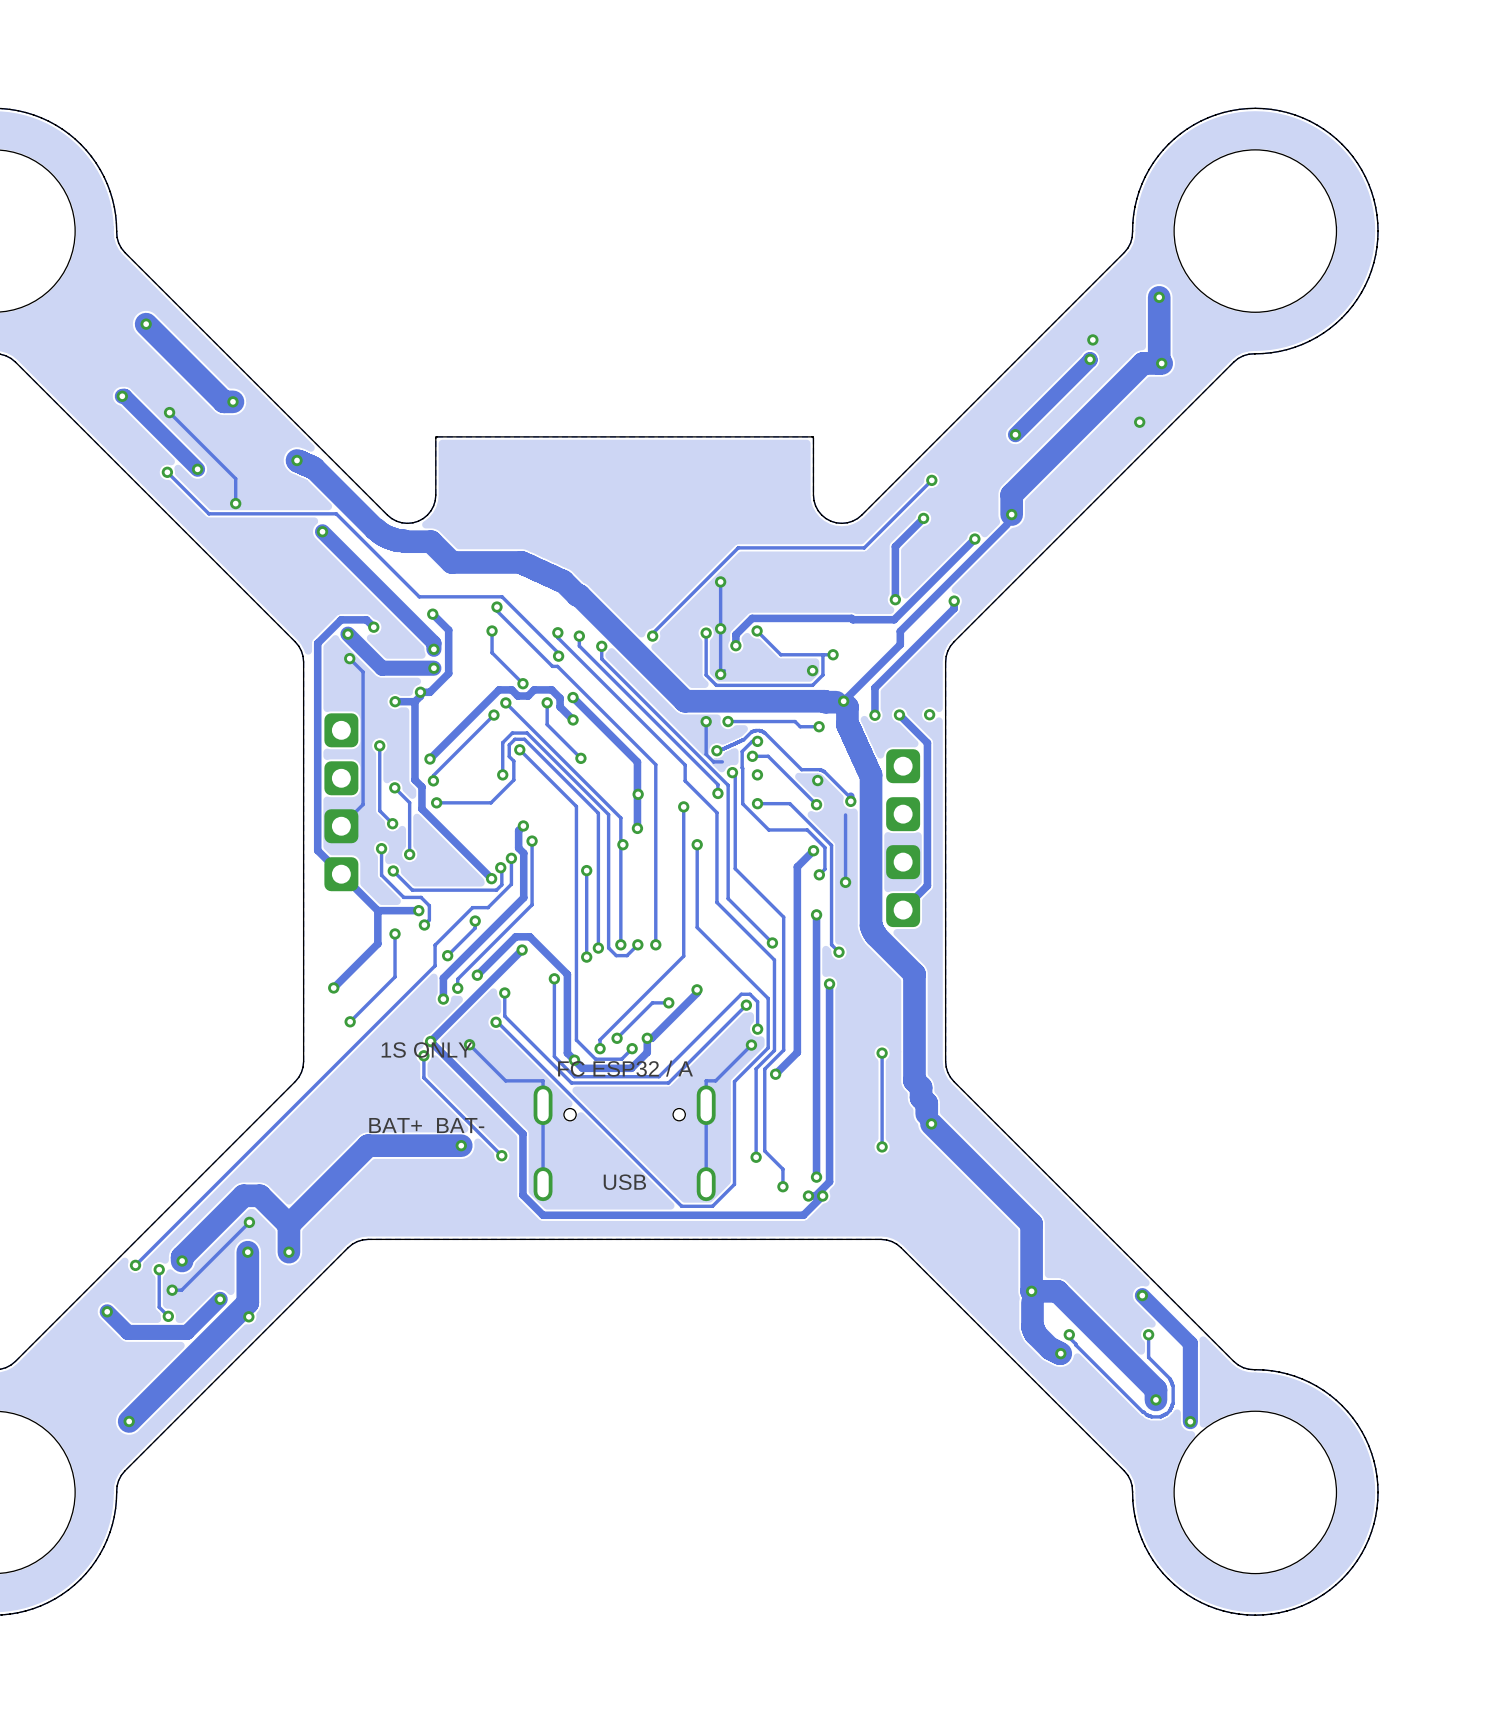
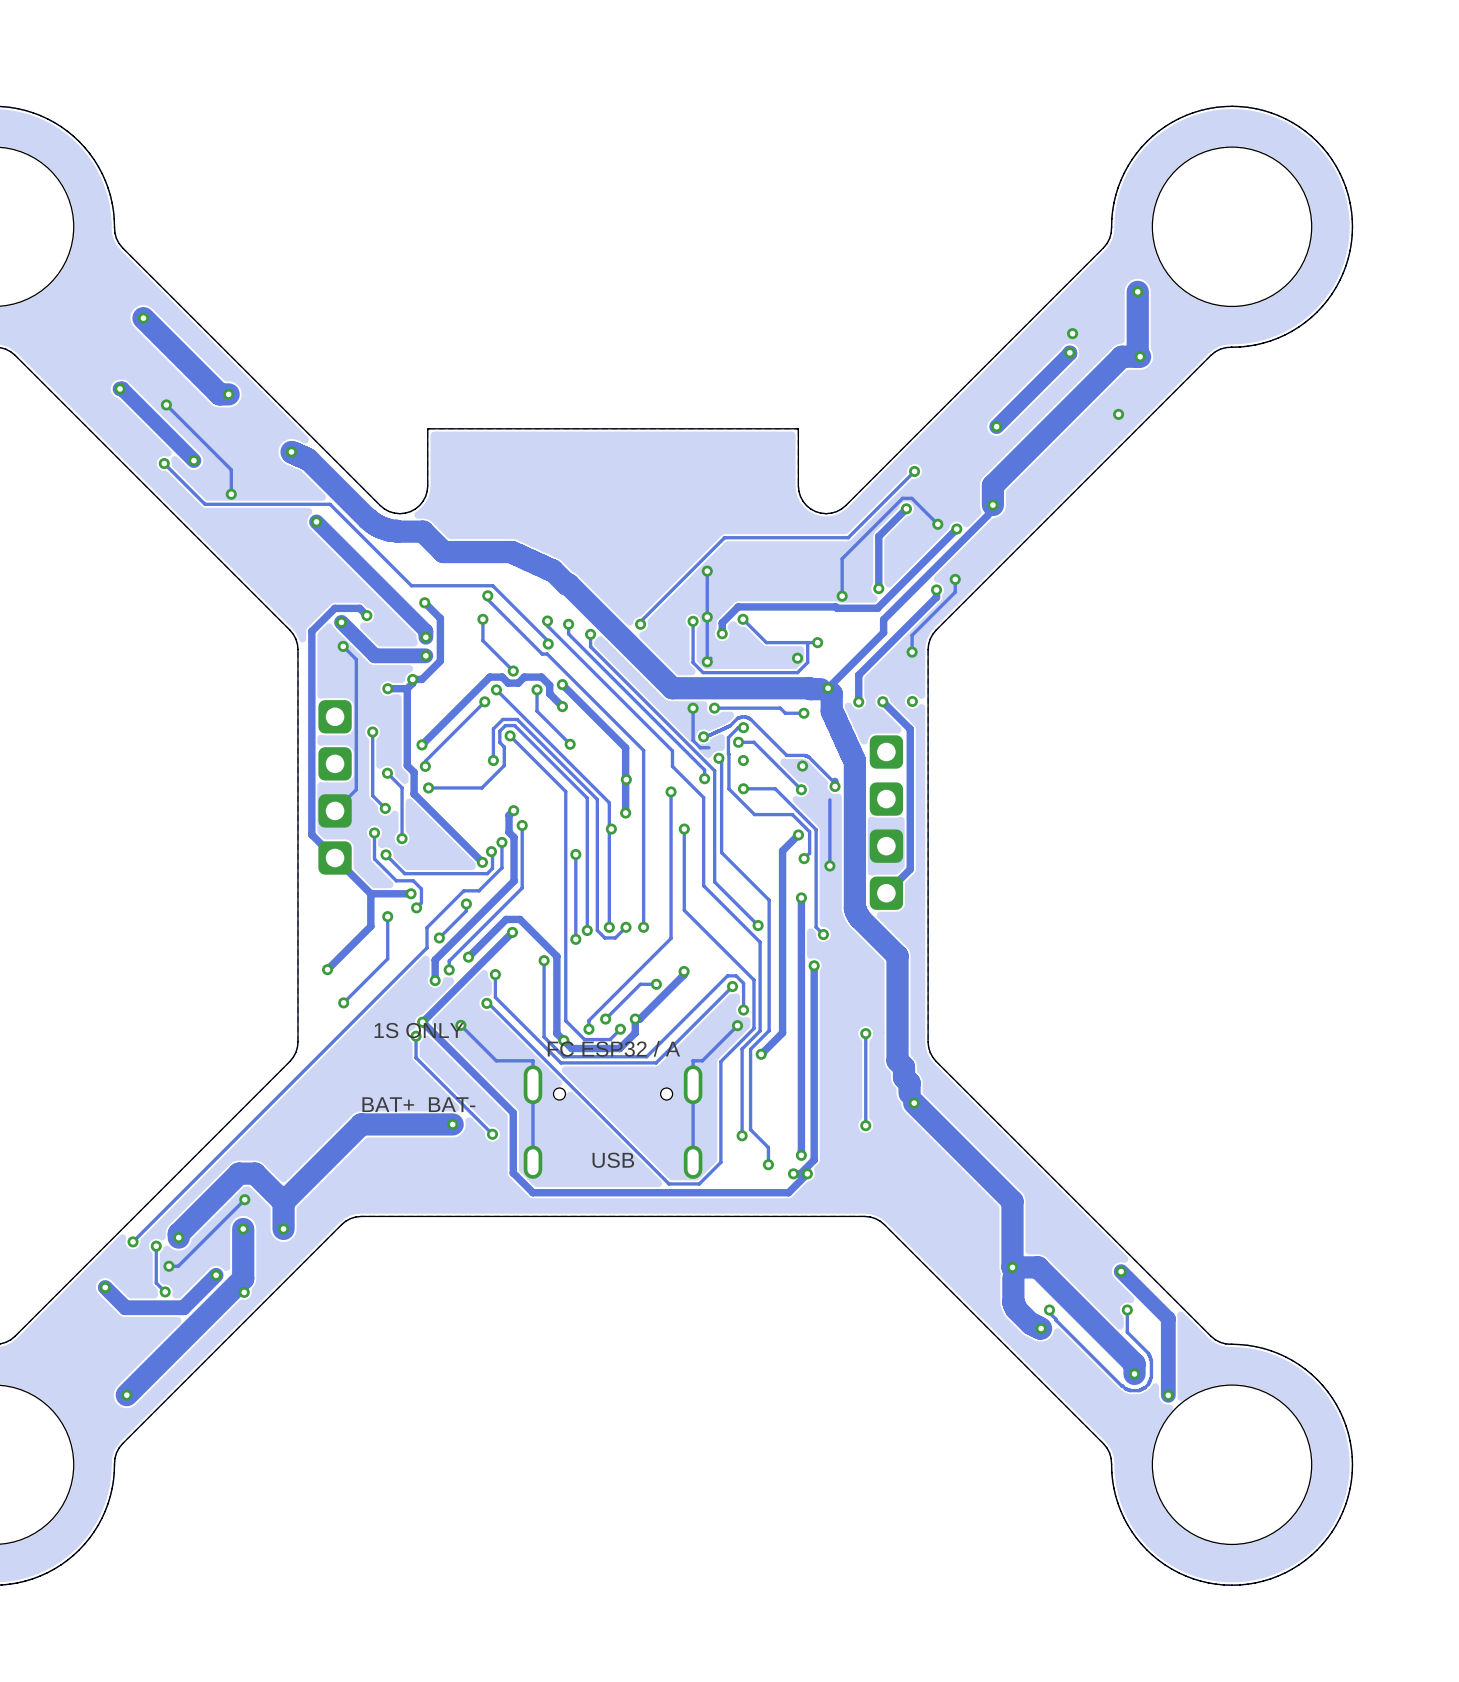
track: none -> (937, 524) (911, 498) (902, 498) (842, 558) (842, 596)
via: none -> (937, 524)
track: none -> (955, 579) (955, 592) (912, 635) (912, 652)
via: none -> (955, 579)
via: none -> (842, 596)
via: none -> (912, 652)

